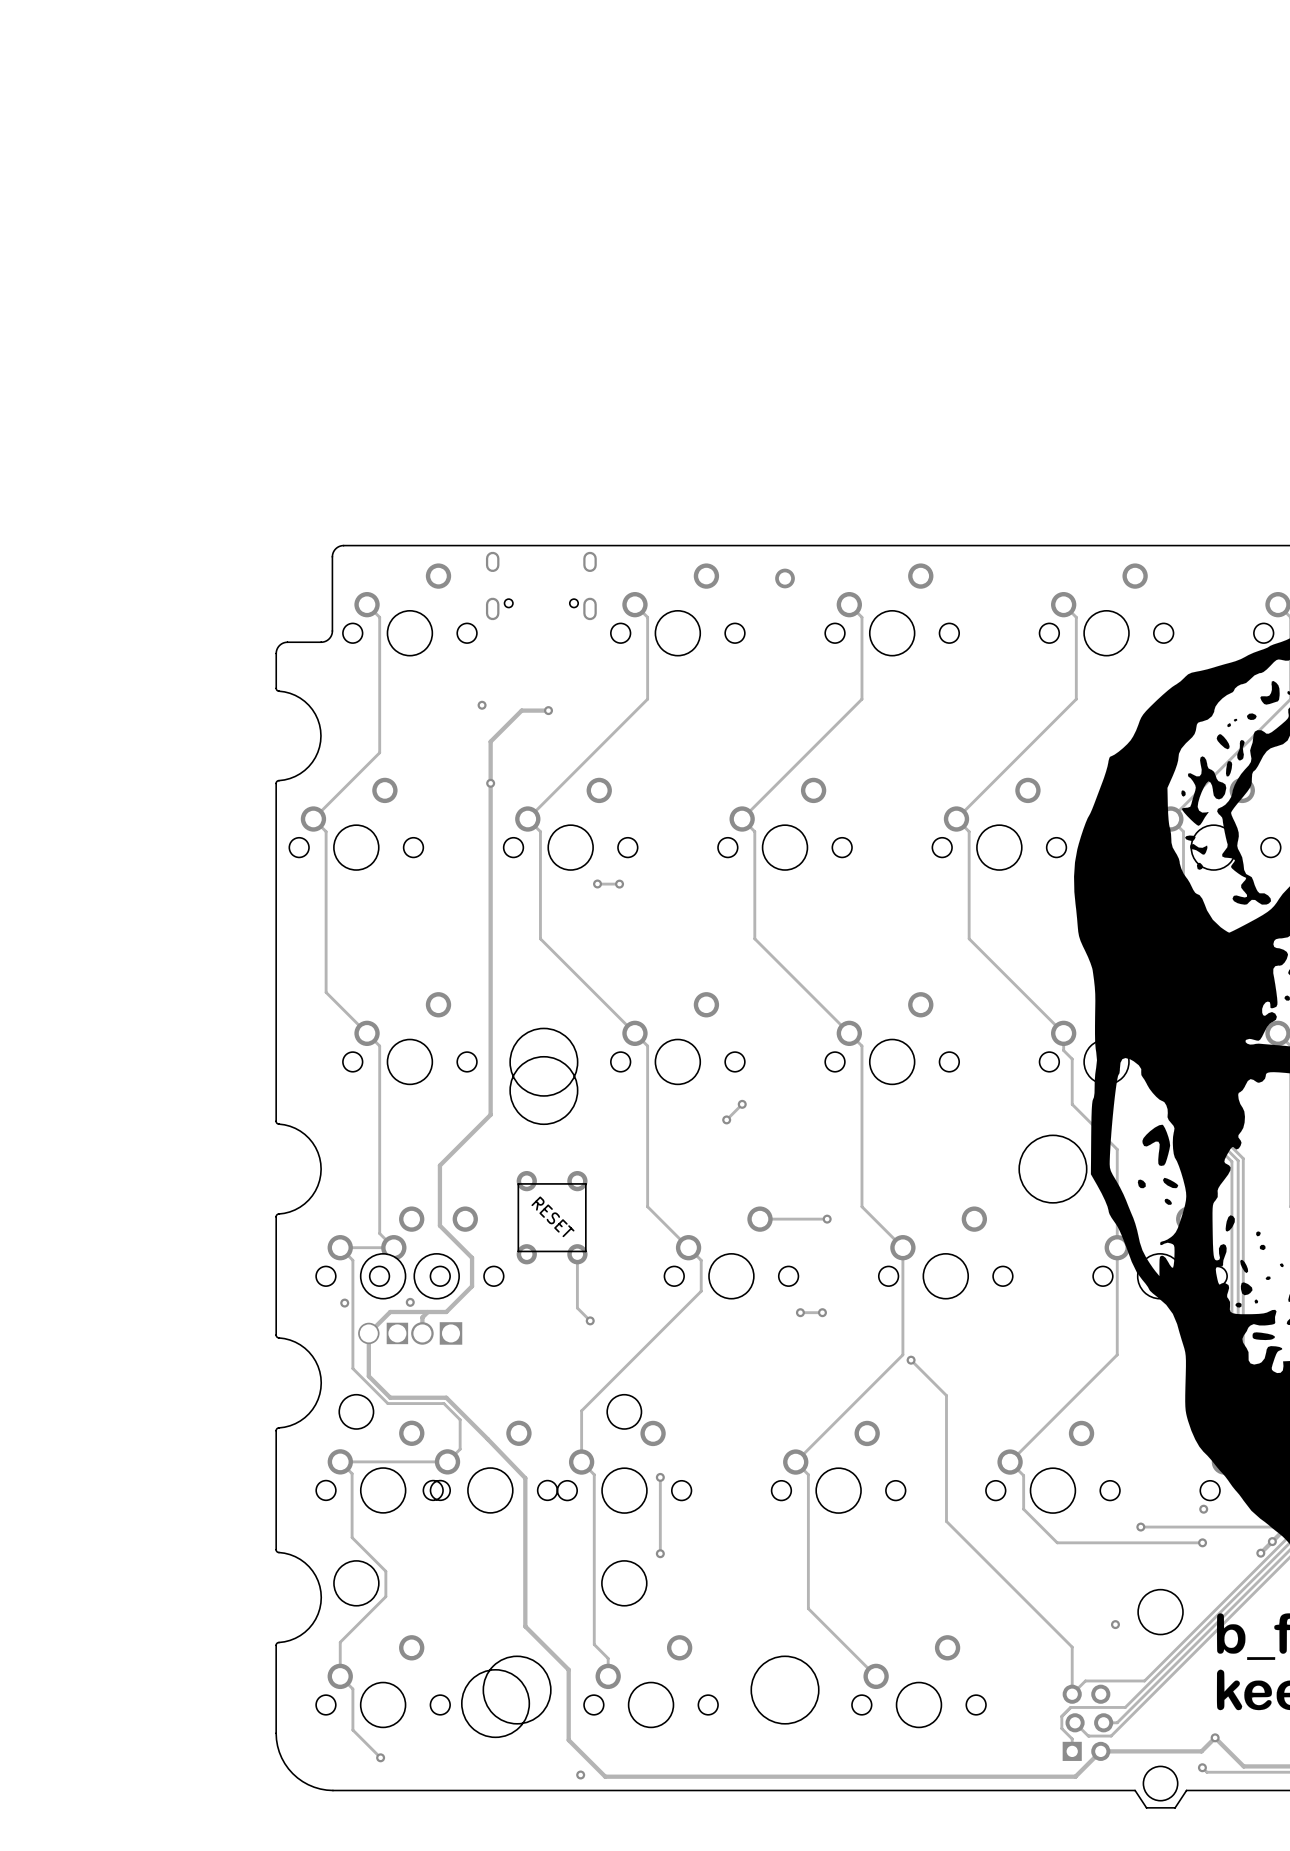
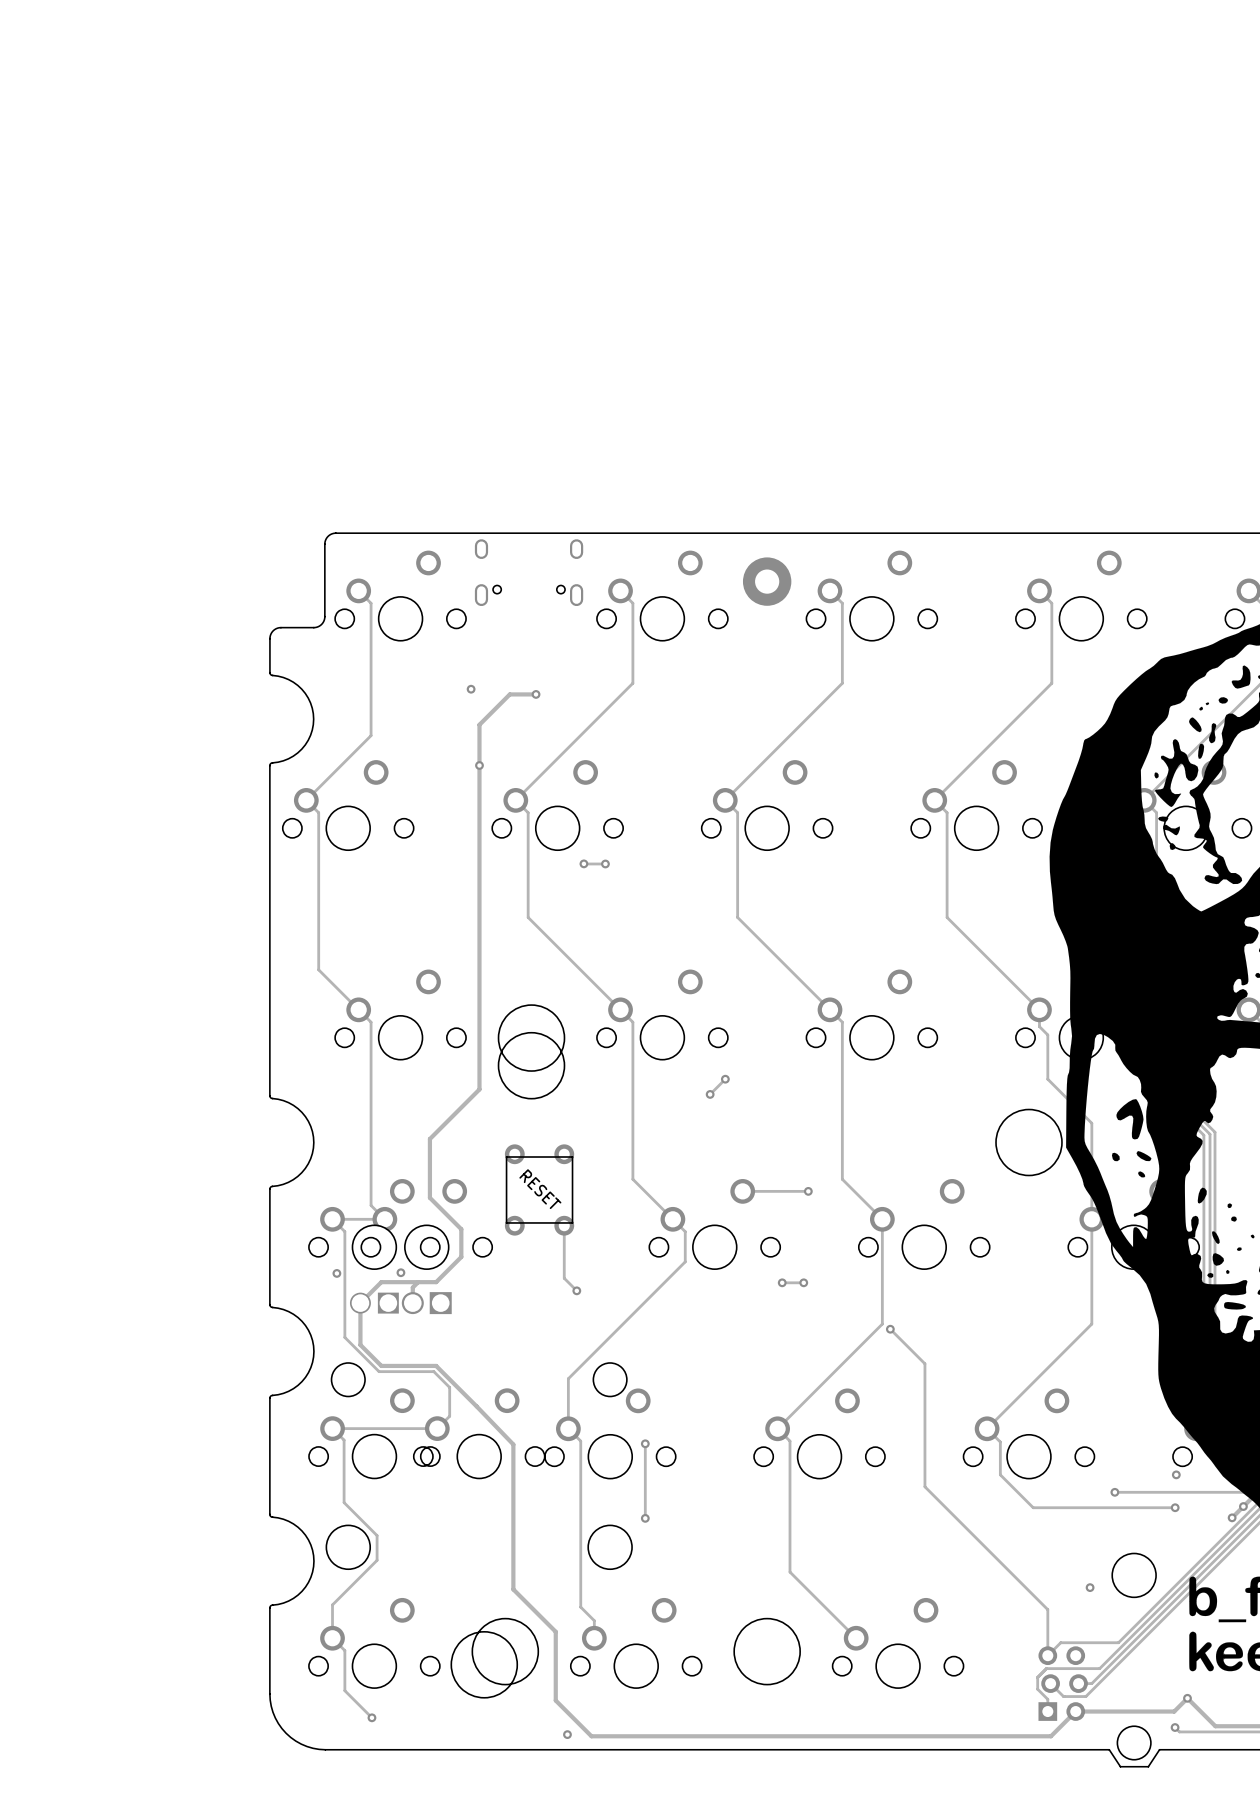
part: (785, 578) -> none
part: none -> (767, 581)

